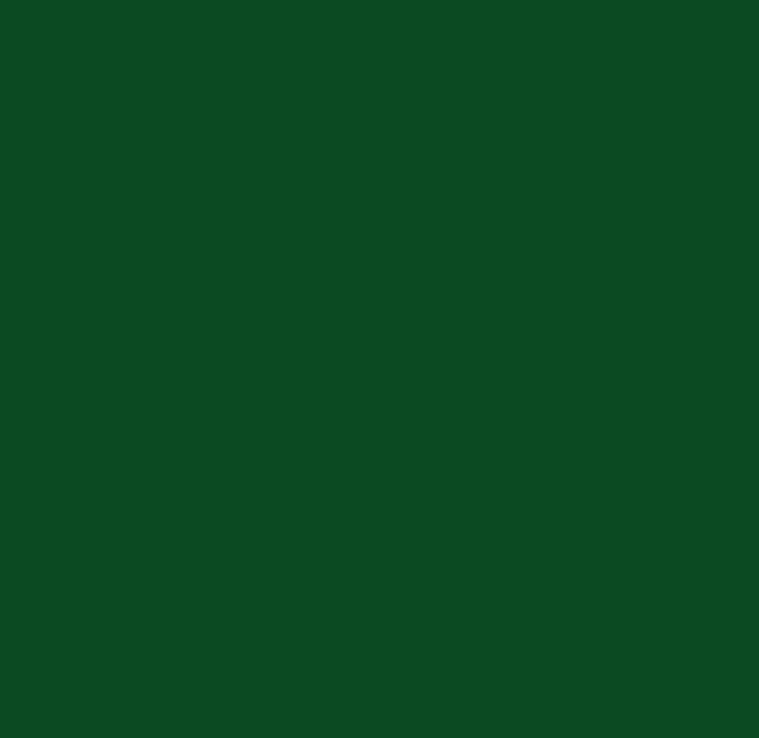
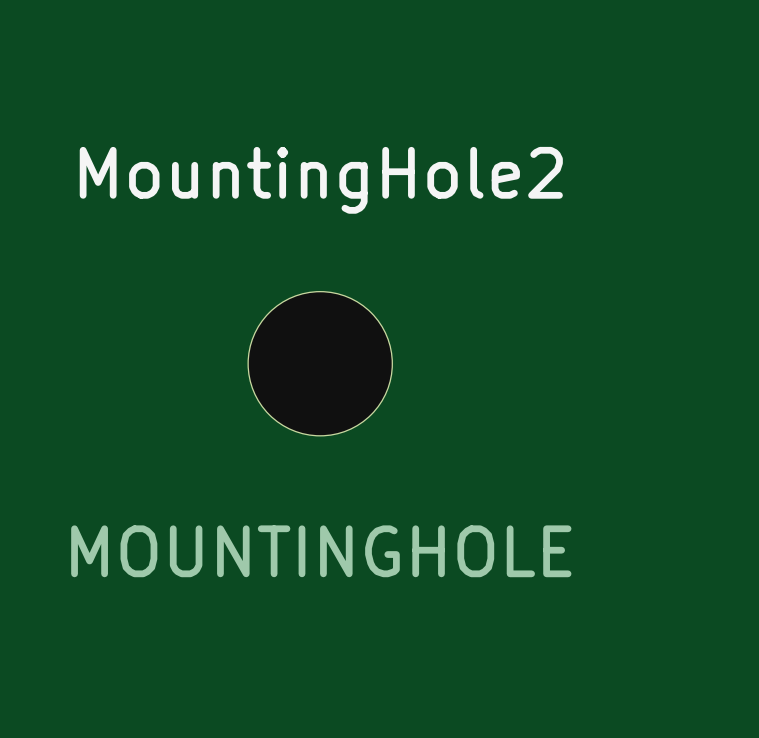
MountingHole2: none -> MOUNTINGHOLE (320, 363)

